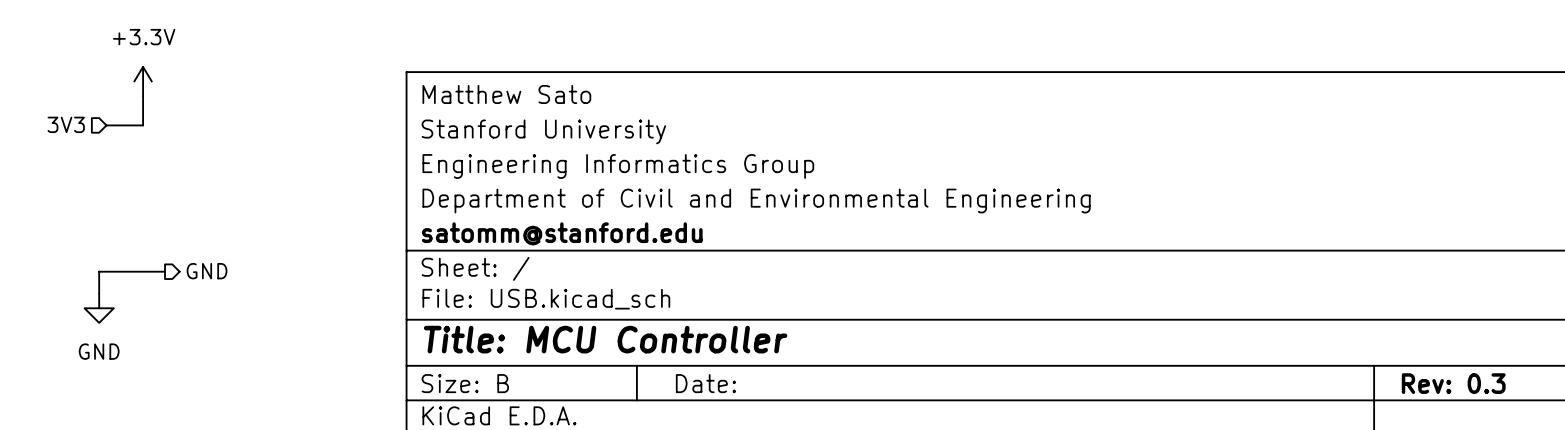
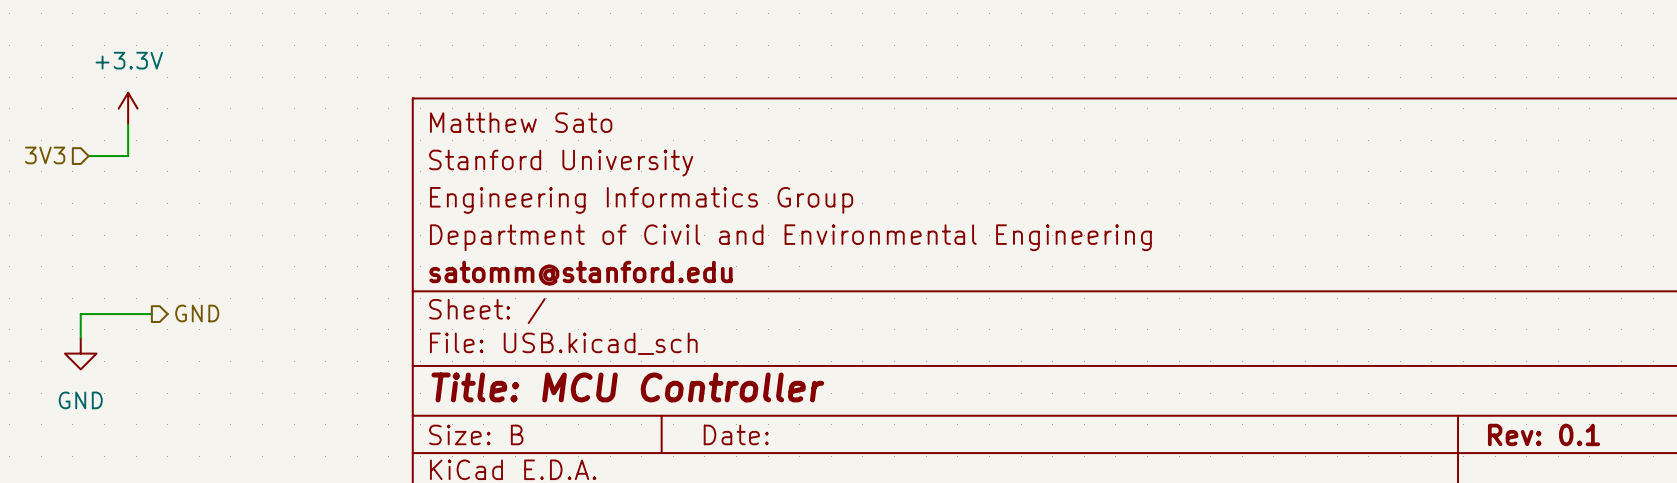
title block: Rev: 0.3 (1453, 383) -> Rev: 0.1 (1544, 434)

